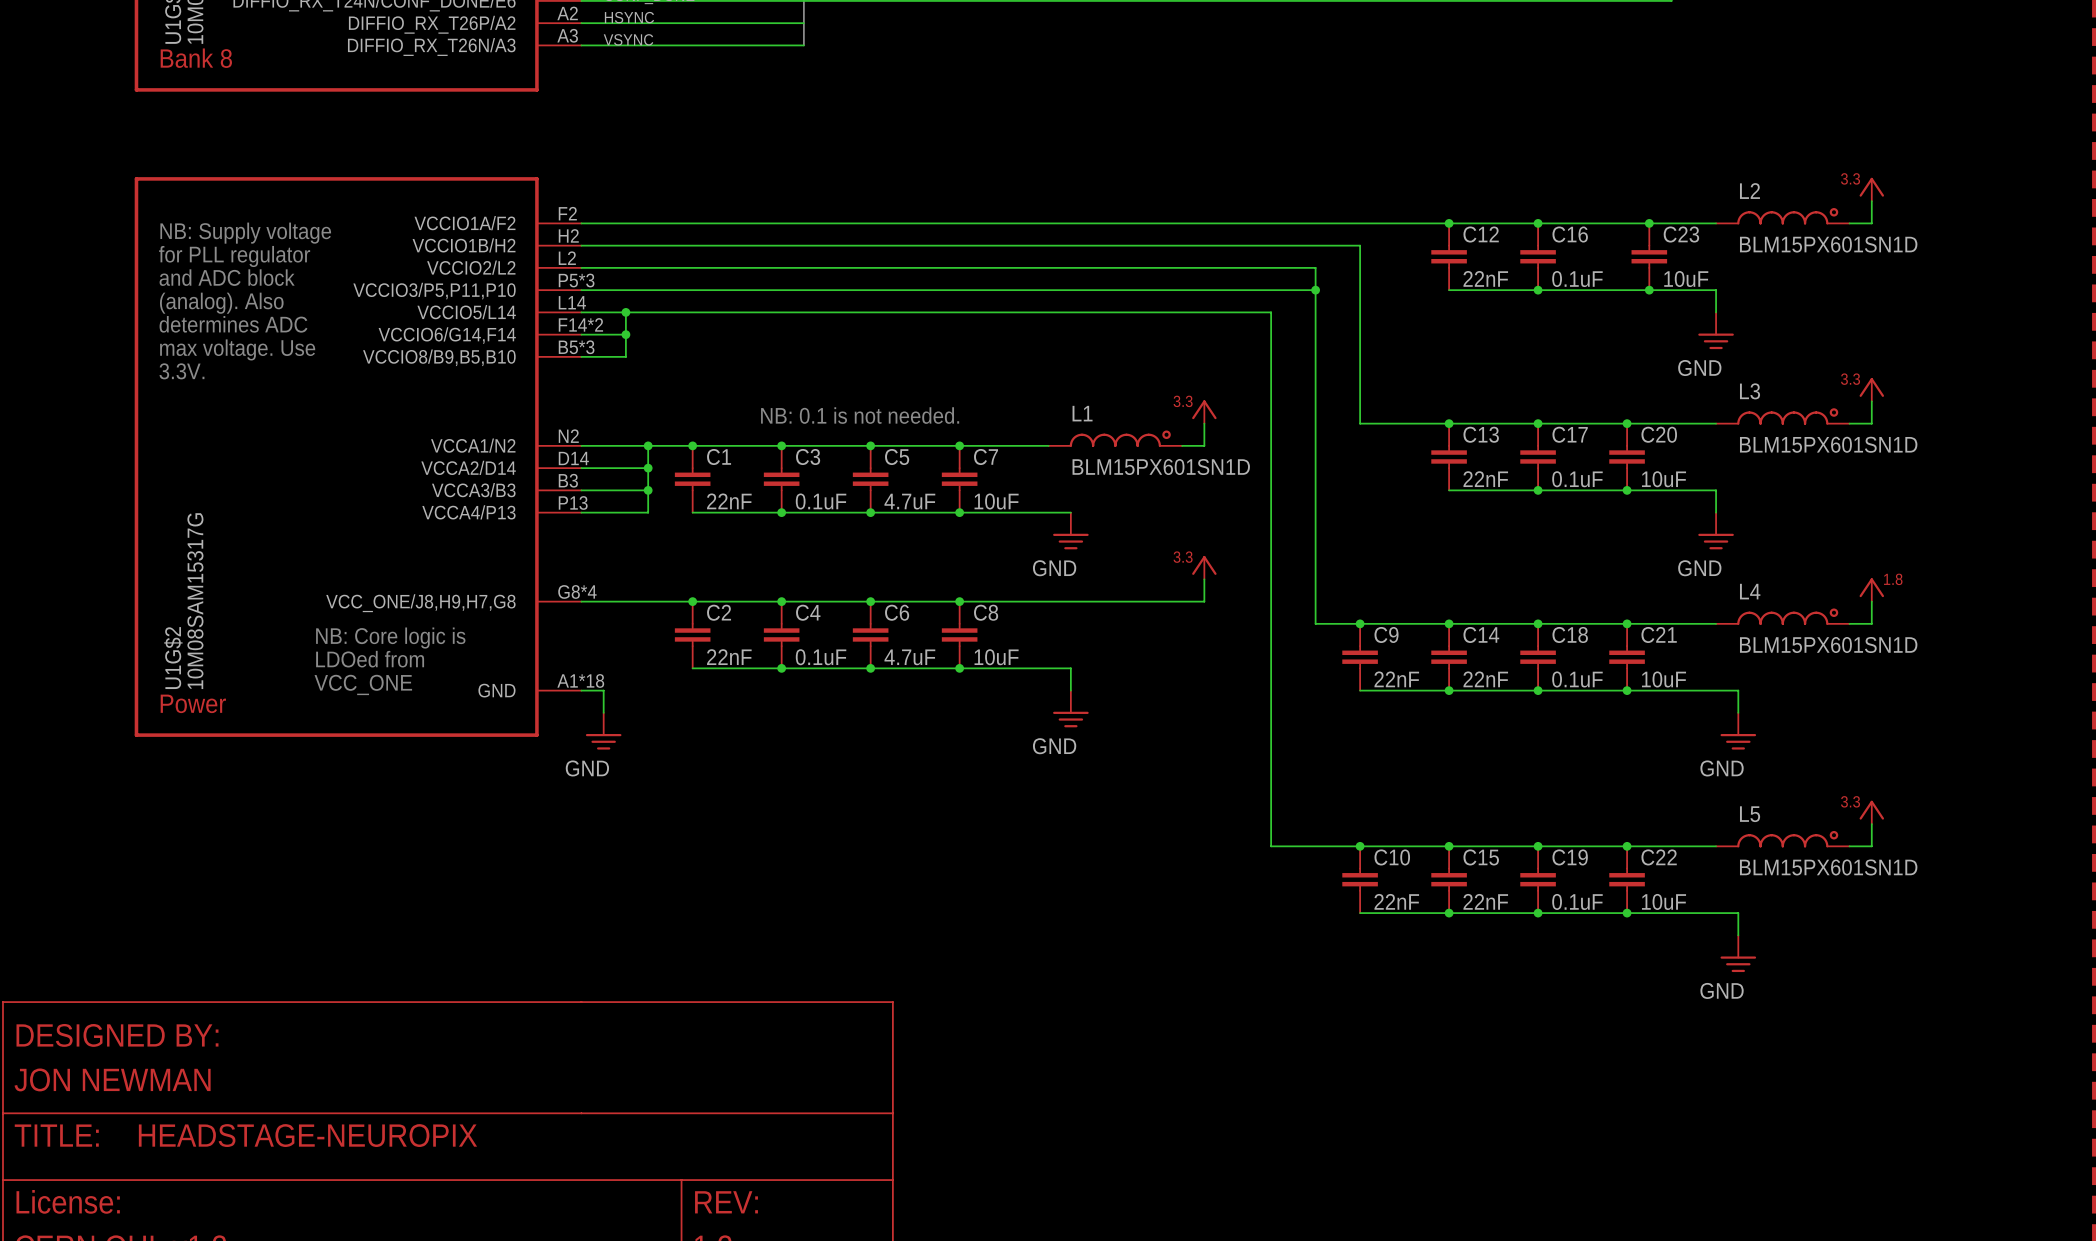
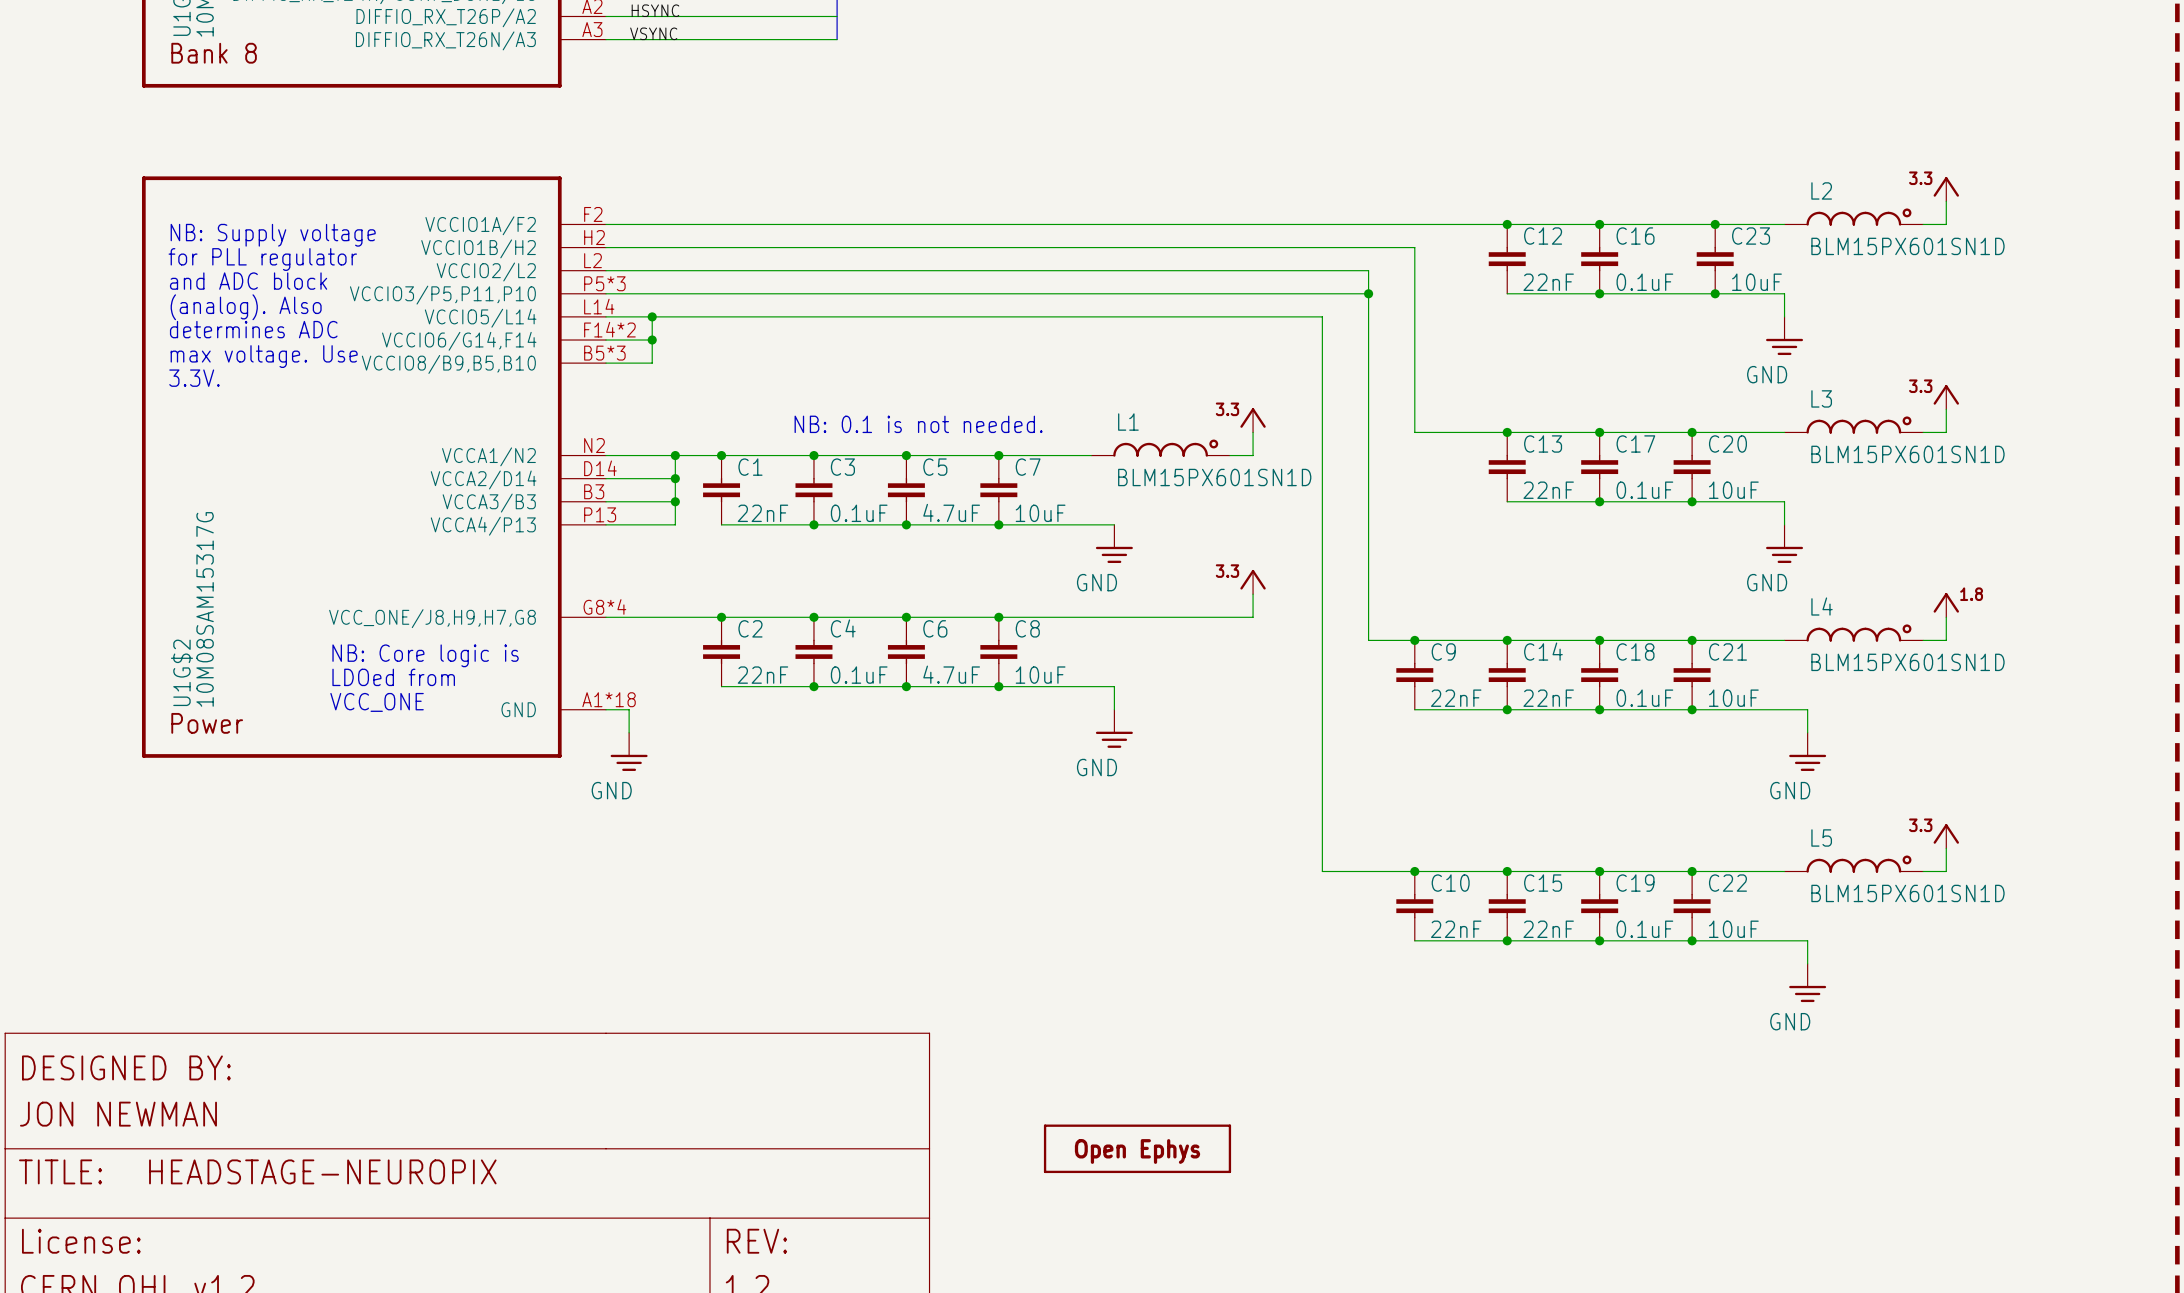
part: none -> (1137, 1148)

